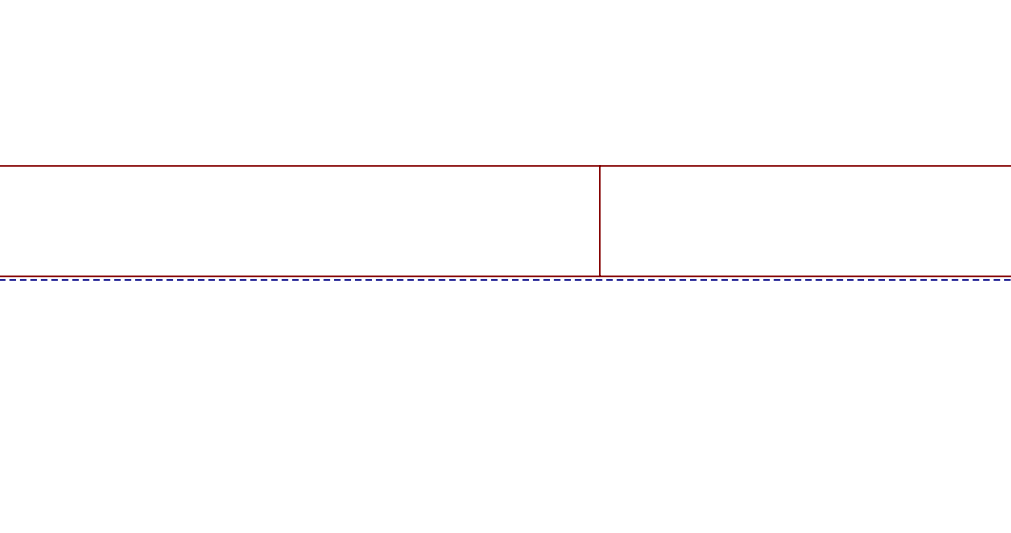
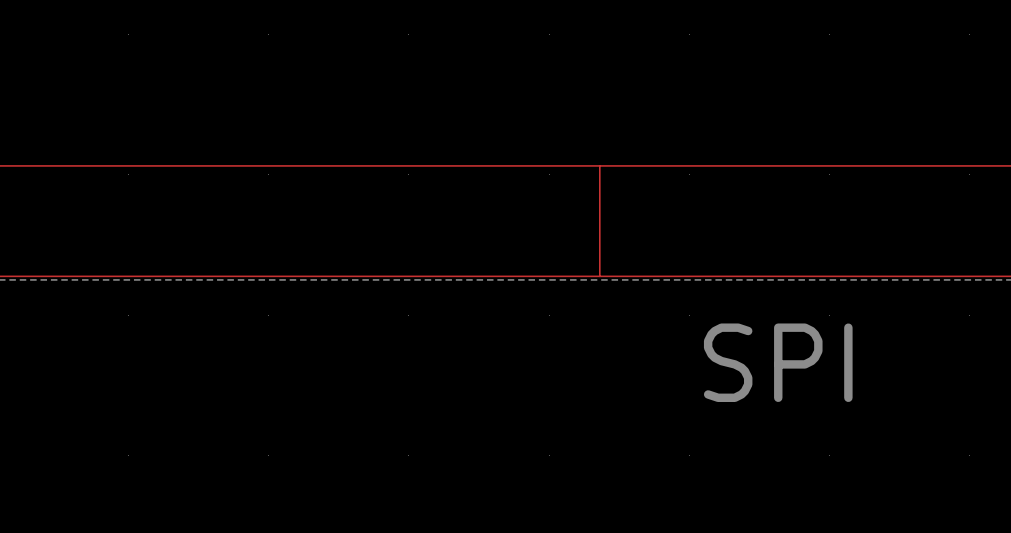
text: none -> SPI (778, 362)

